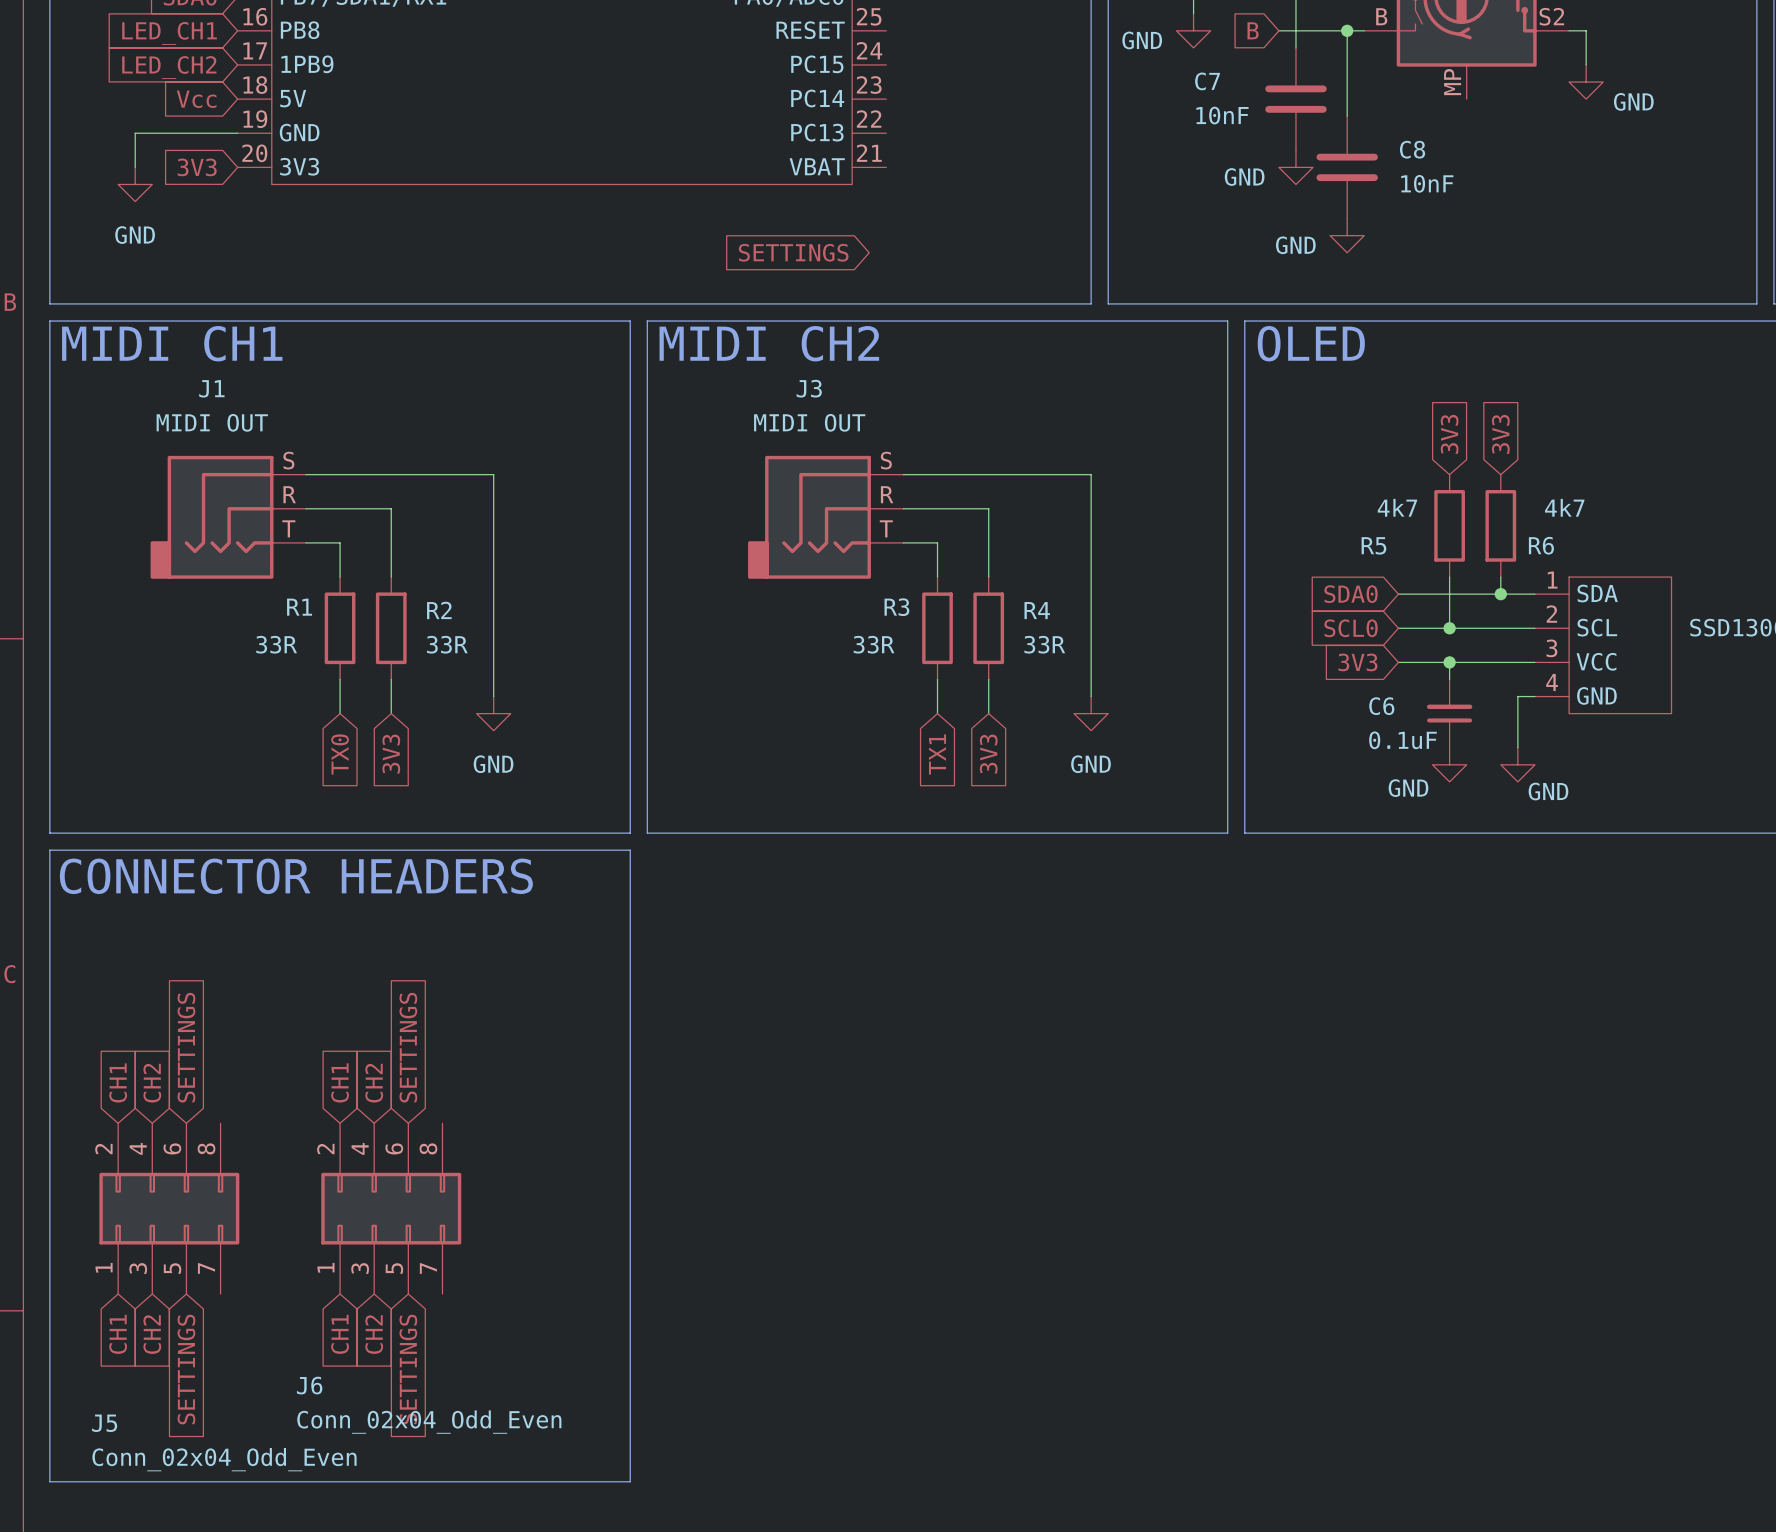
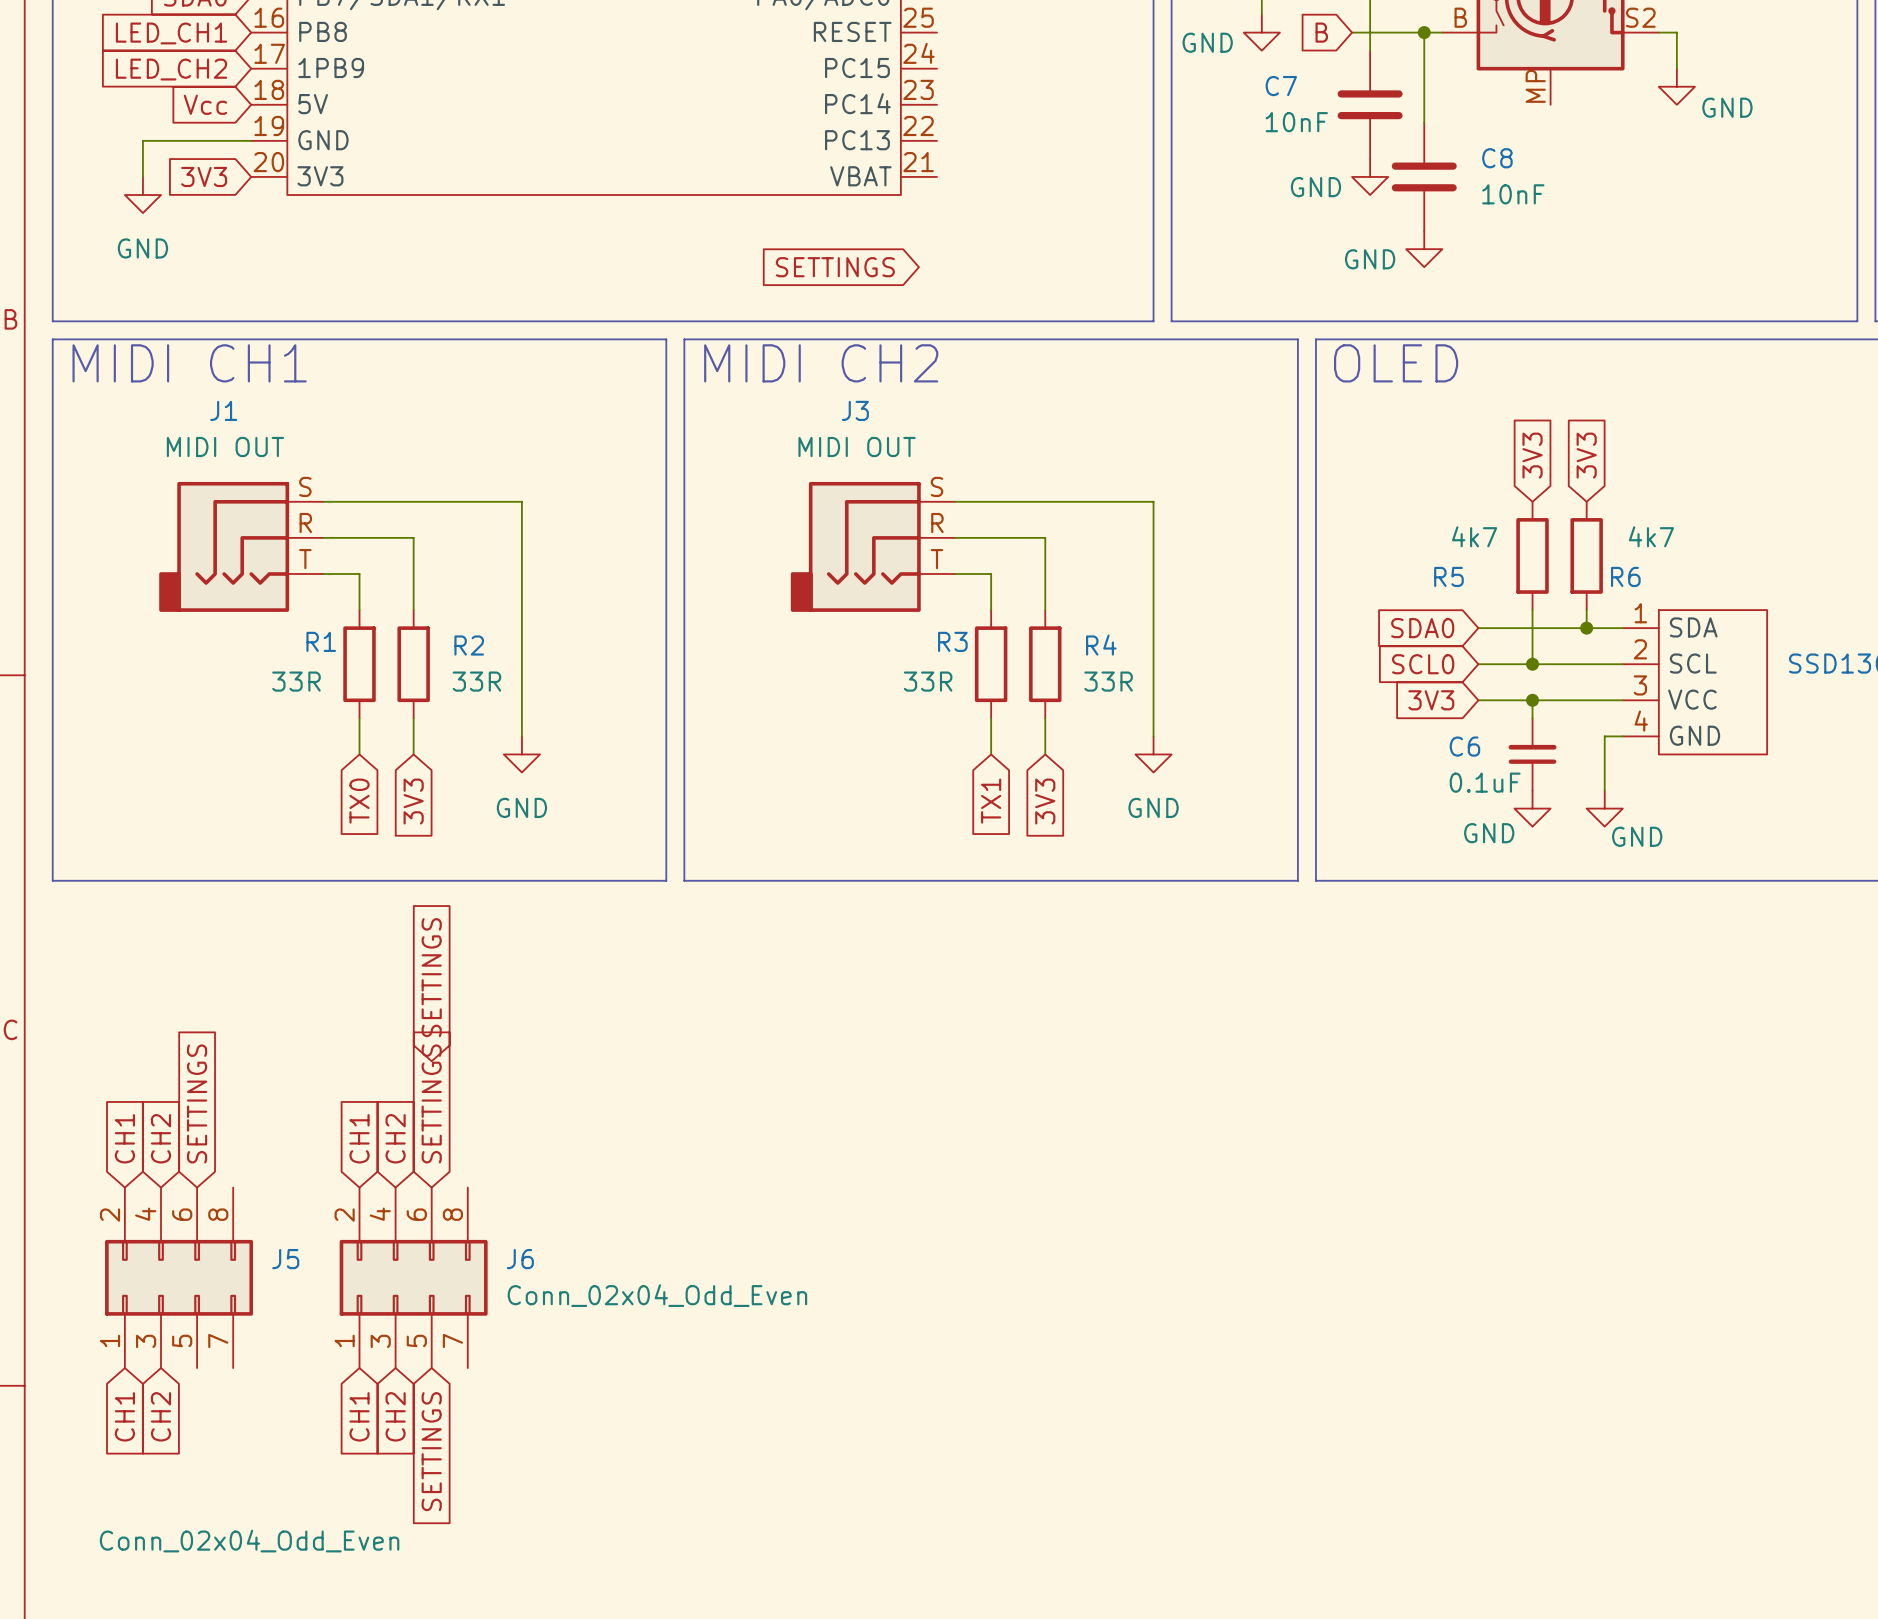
line: (49, 850) (630, 850) (630, 1481) (49, 1481) (49, 850) -> none
text: CONNECTOR HEADERS (296, 876) -> none
global label: none -> SETTINGS (431, 977)
global label: SETTINGS (186, 1369) -> none
J6 name position: J6 (309, 1385) -> J6 (520, 1259)
J6 value position: Conn_02x04_Odd_Even (429, 1422) -> Conn_02x04_Odd_Even (657, 1295)
J5 name position: J5 (104, 1423) -> J5 (285, 1259)

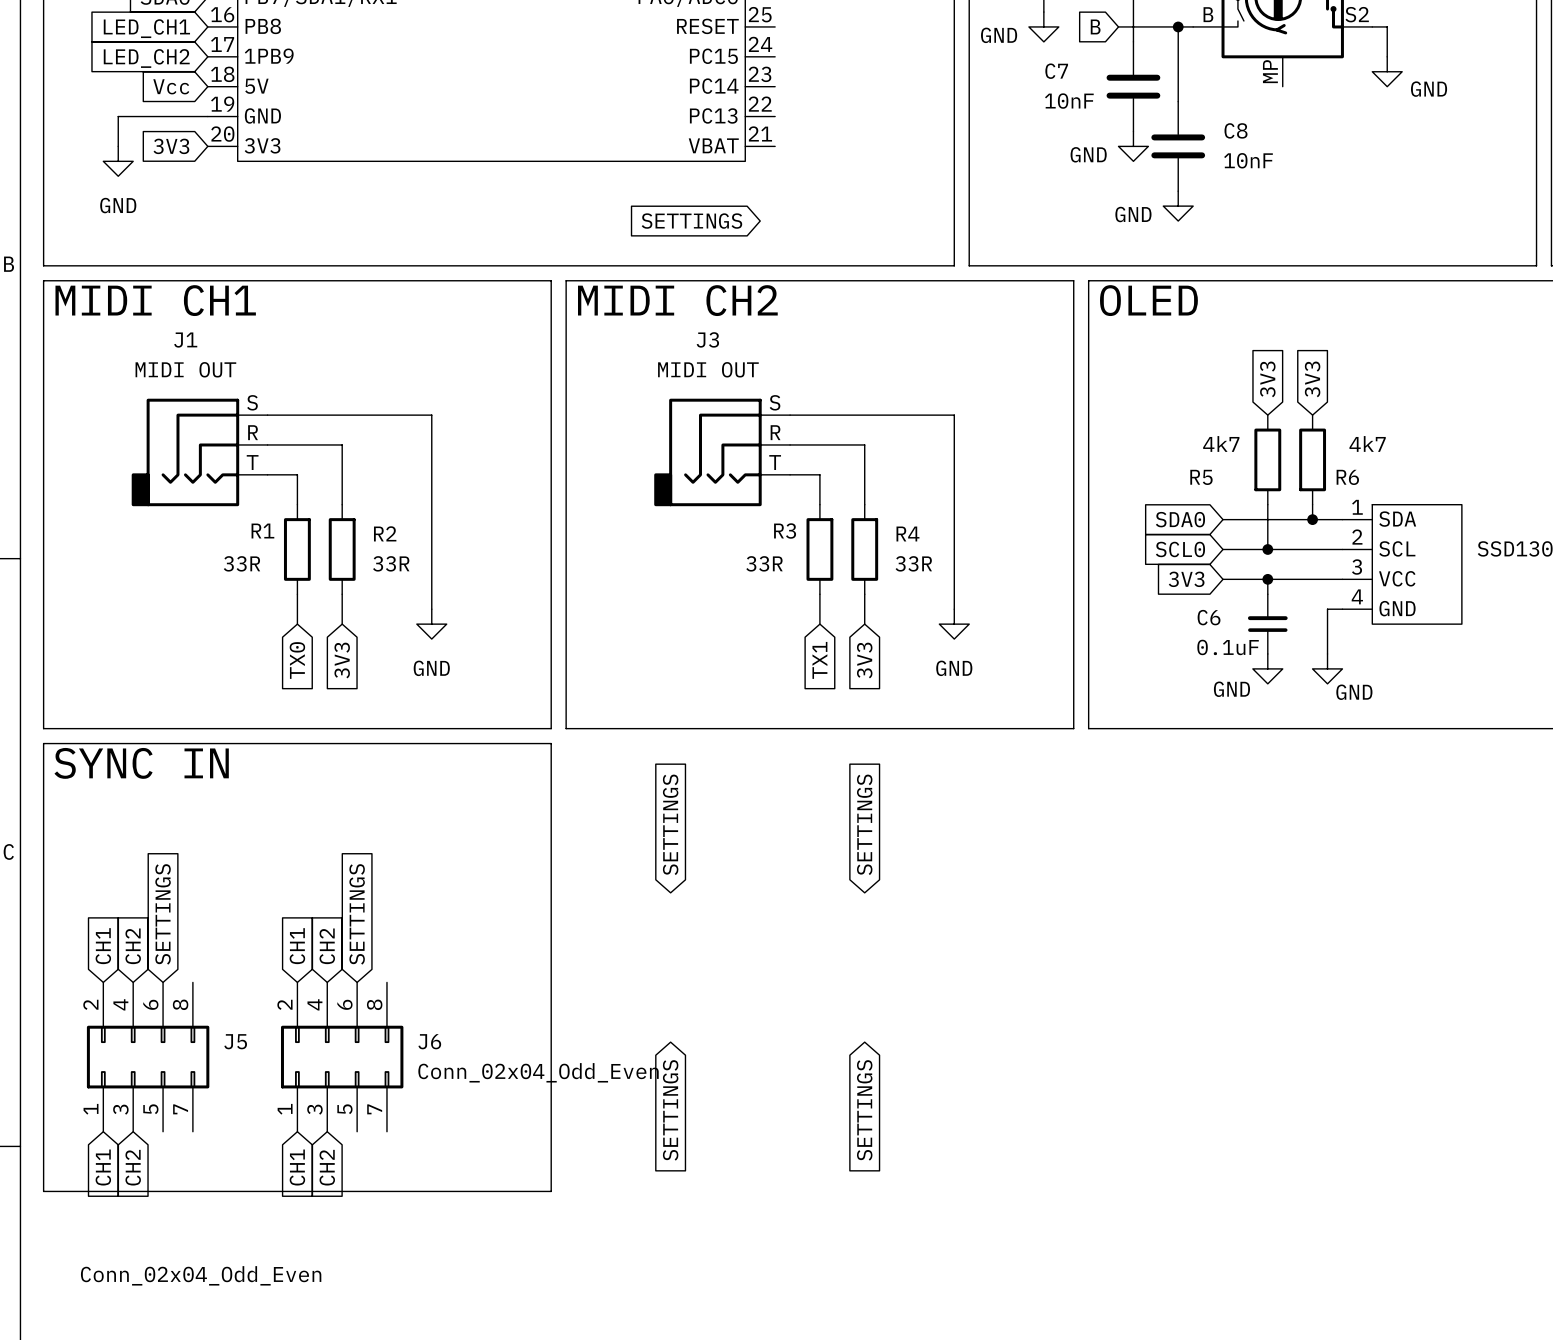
line: none -> (43, 743) (551, 743) (551, 1191) (43, 1191) (43, 743)
text: none -> SYNC IN (141, 763)
global label: SETTINGS (431, 977) -> none
global label: none -> SETTINGS (670, 824)
global label: none -> SETTINGS (864, 824)
global label: none -> SETTINGS (670, 1110)
global label: none -> SETTINGS (864, 1110)
global label: SETTINGS (431, 1451) -> none

